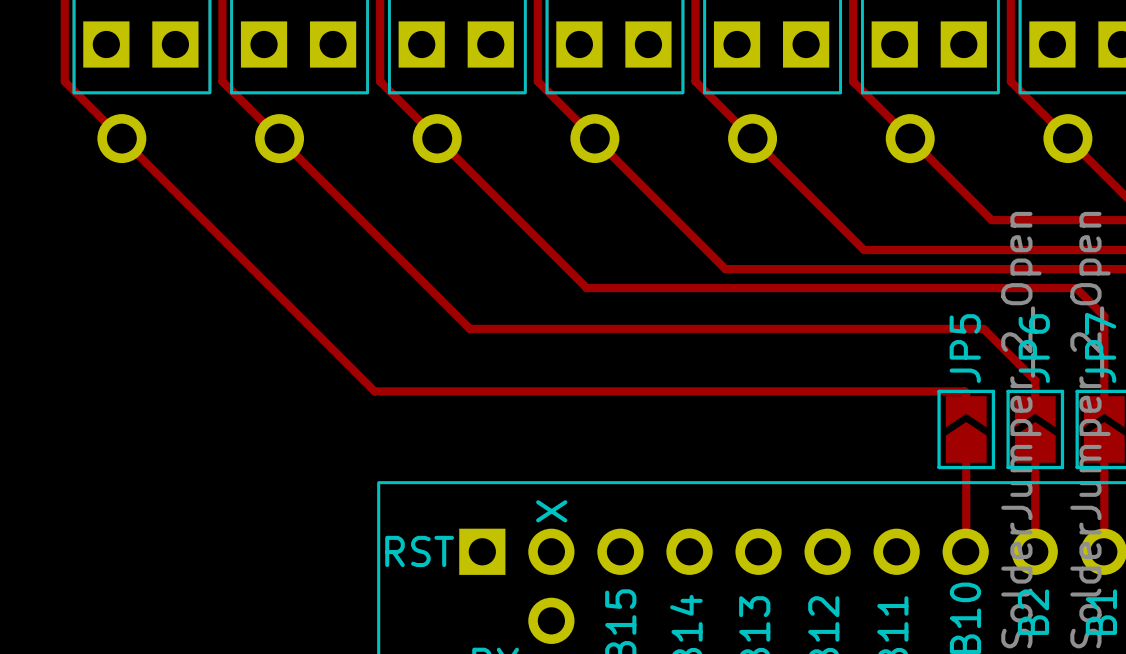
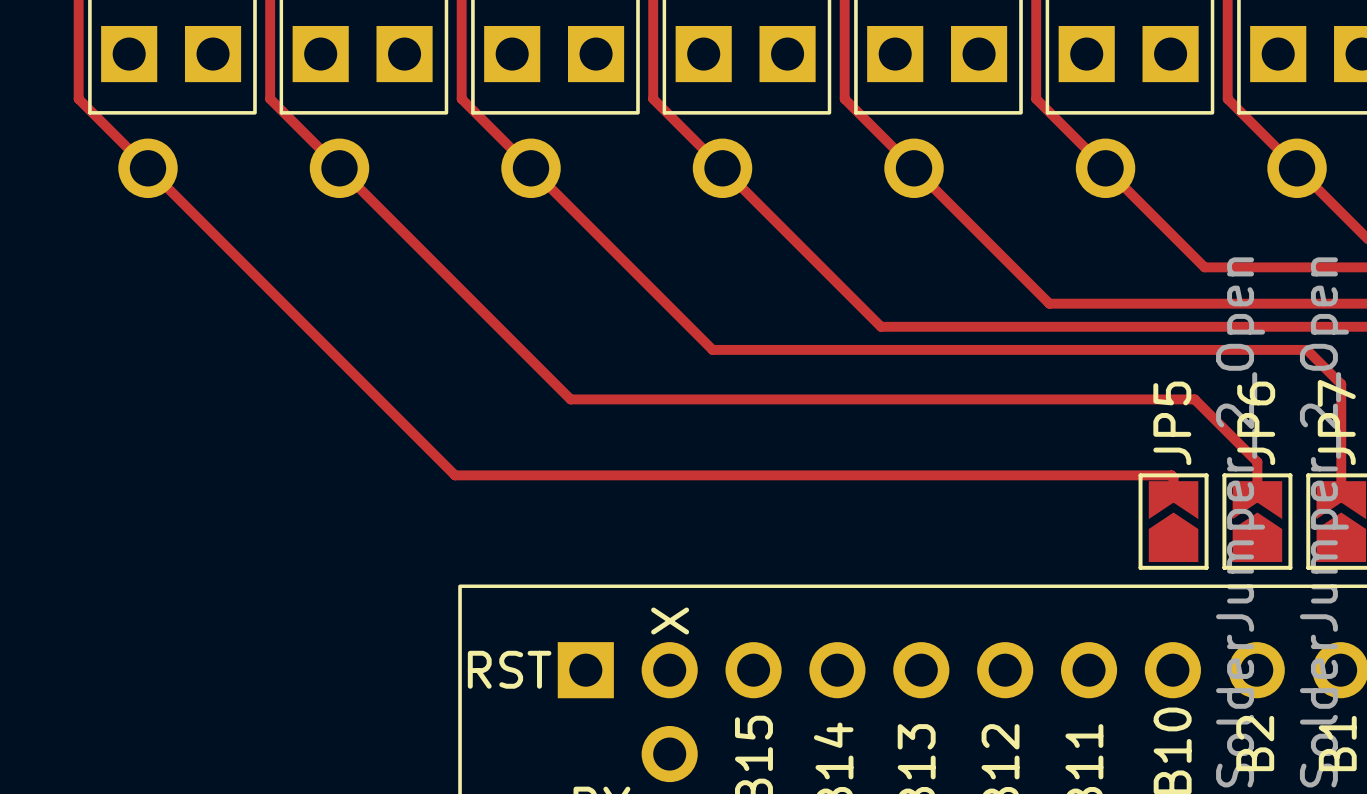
track: (966, 449) (965, 551) -> none
track: (1035, 449) (1034, 551) -> none
track: (1104, 449) (1103, 551) -> none

